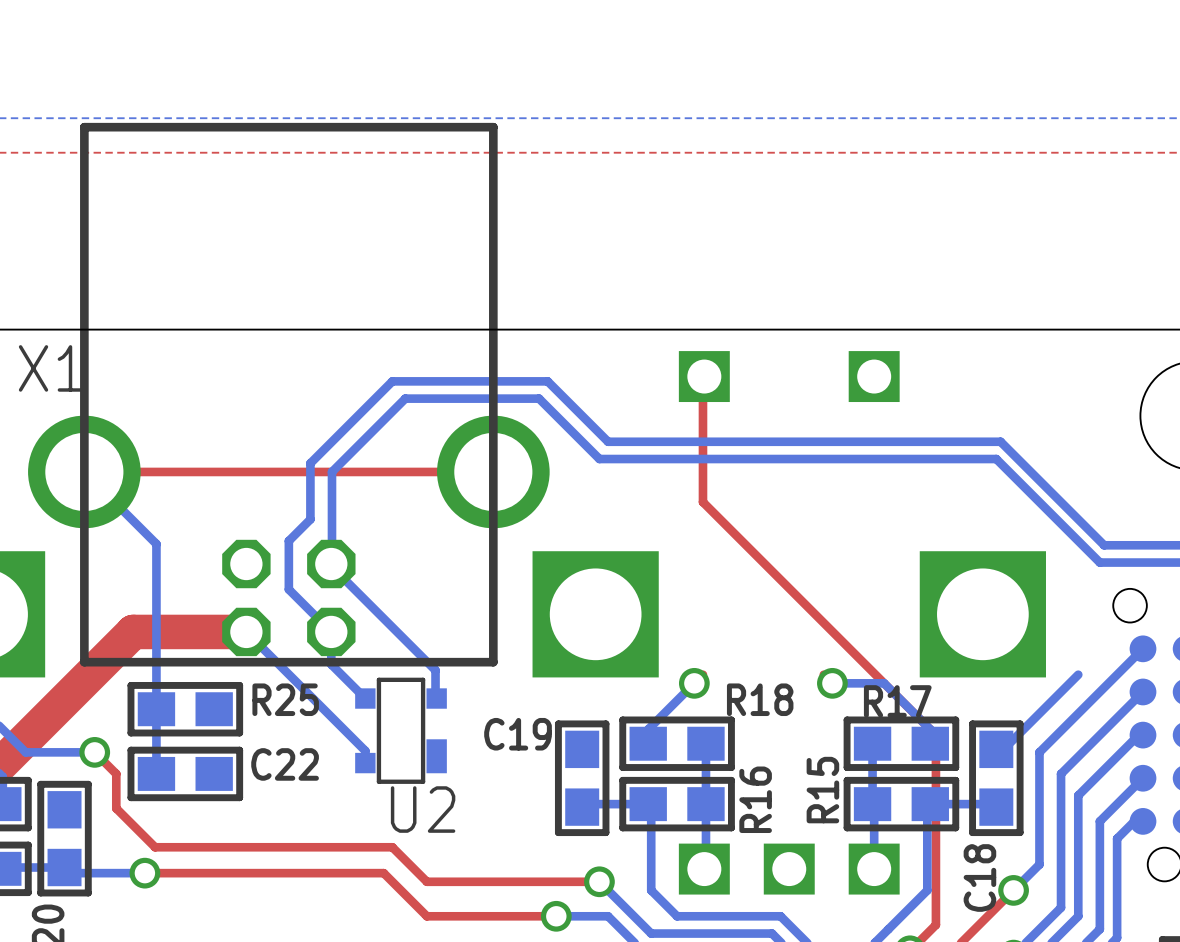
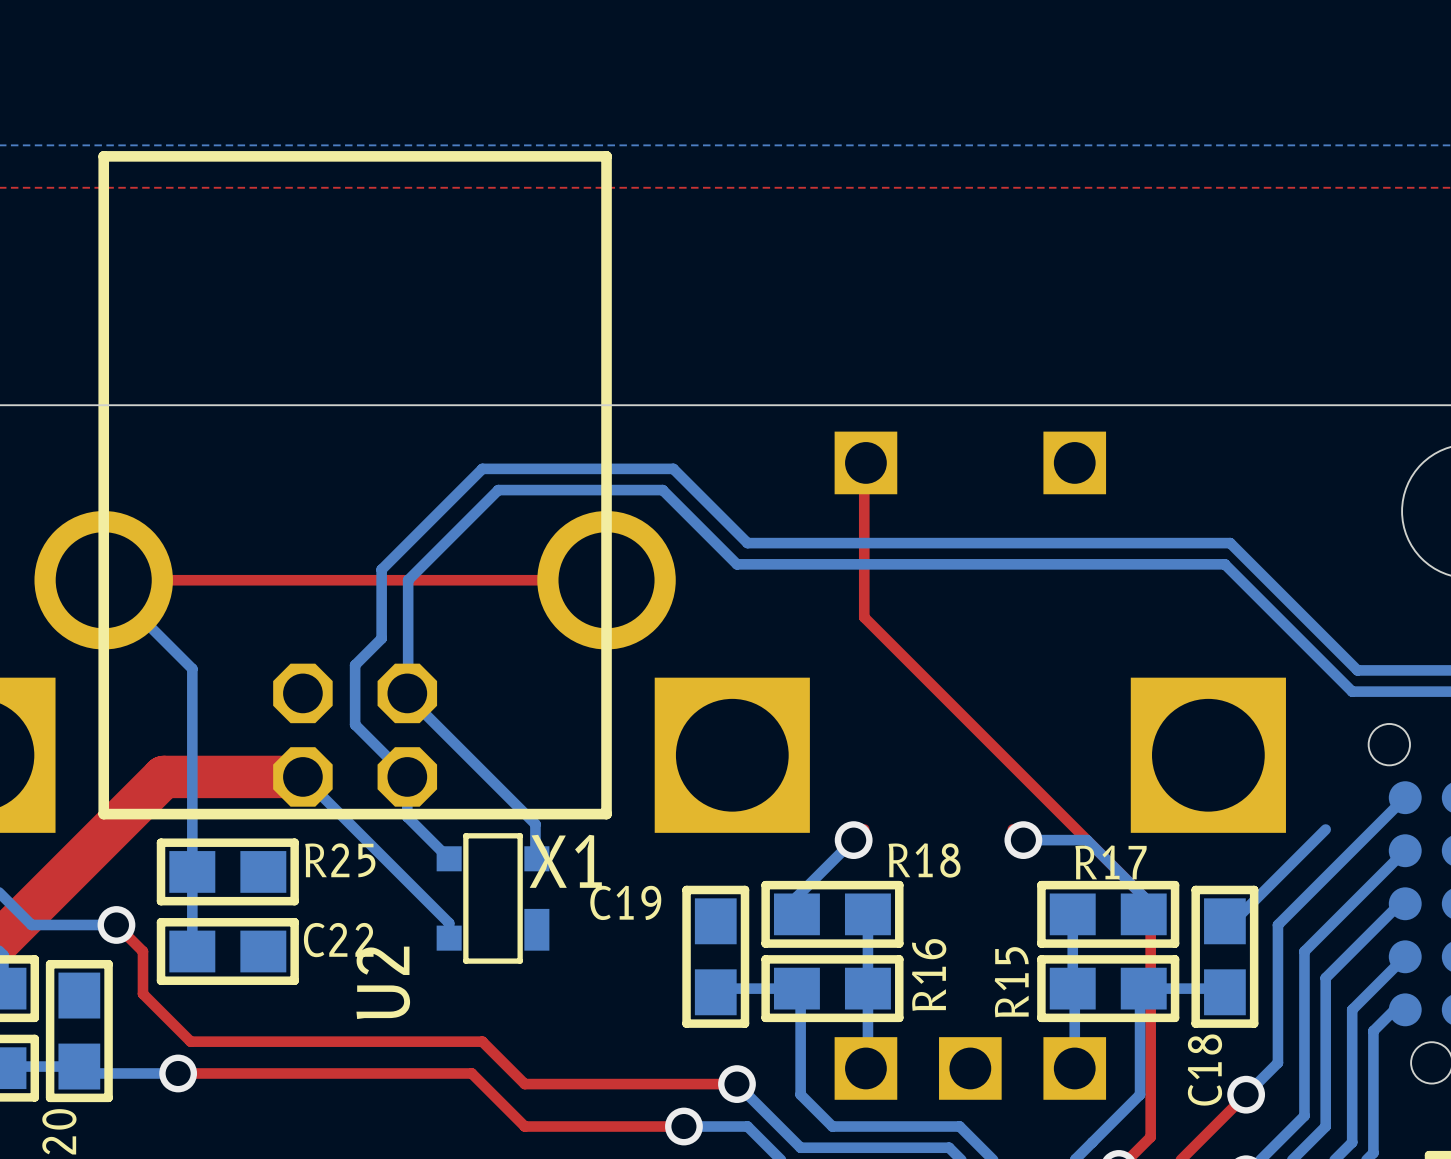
X1 name position: X1 (51, 368) -> X1 (565, 861)
U2 name rotation: 0° (423, 809) -> 90° counterclockwise (383, 982)
U2 name position: U2 (423, 809) -> U2 (383, 982)

